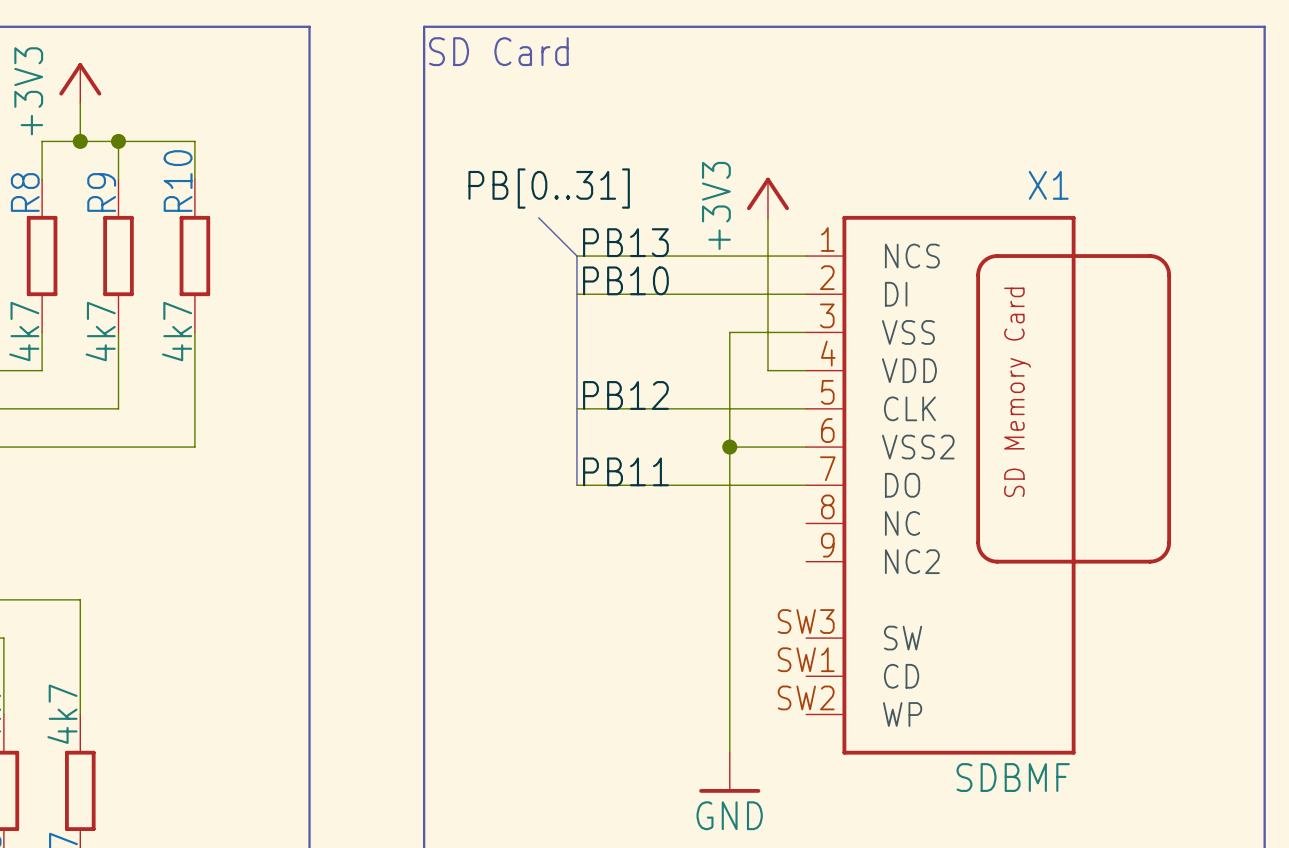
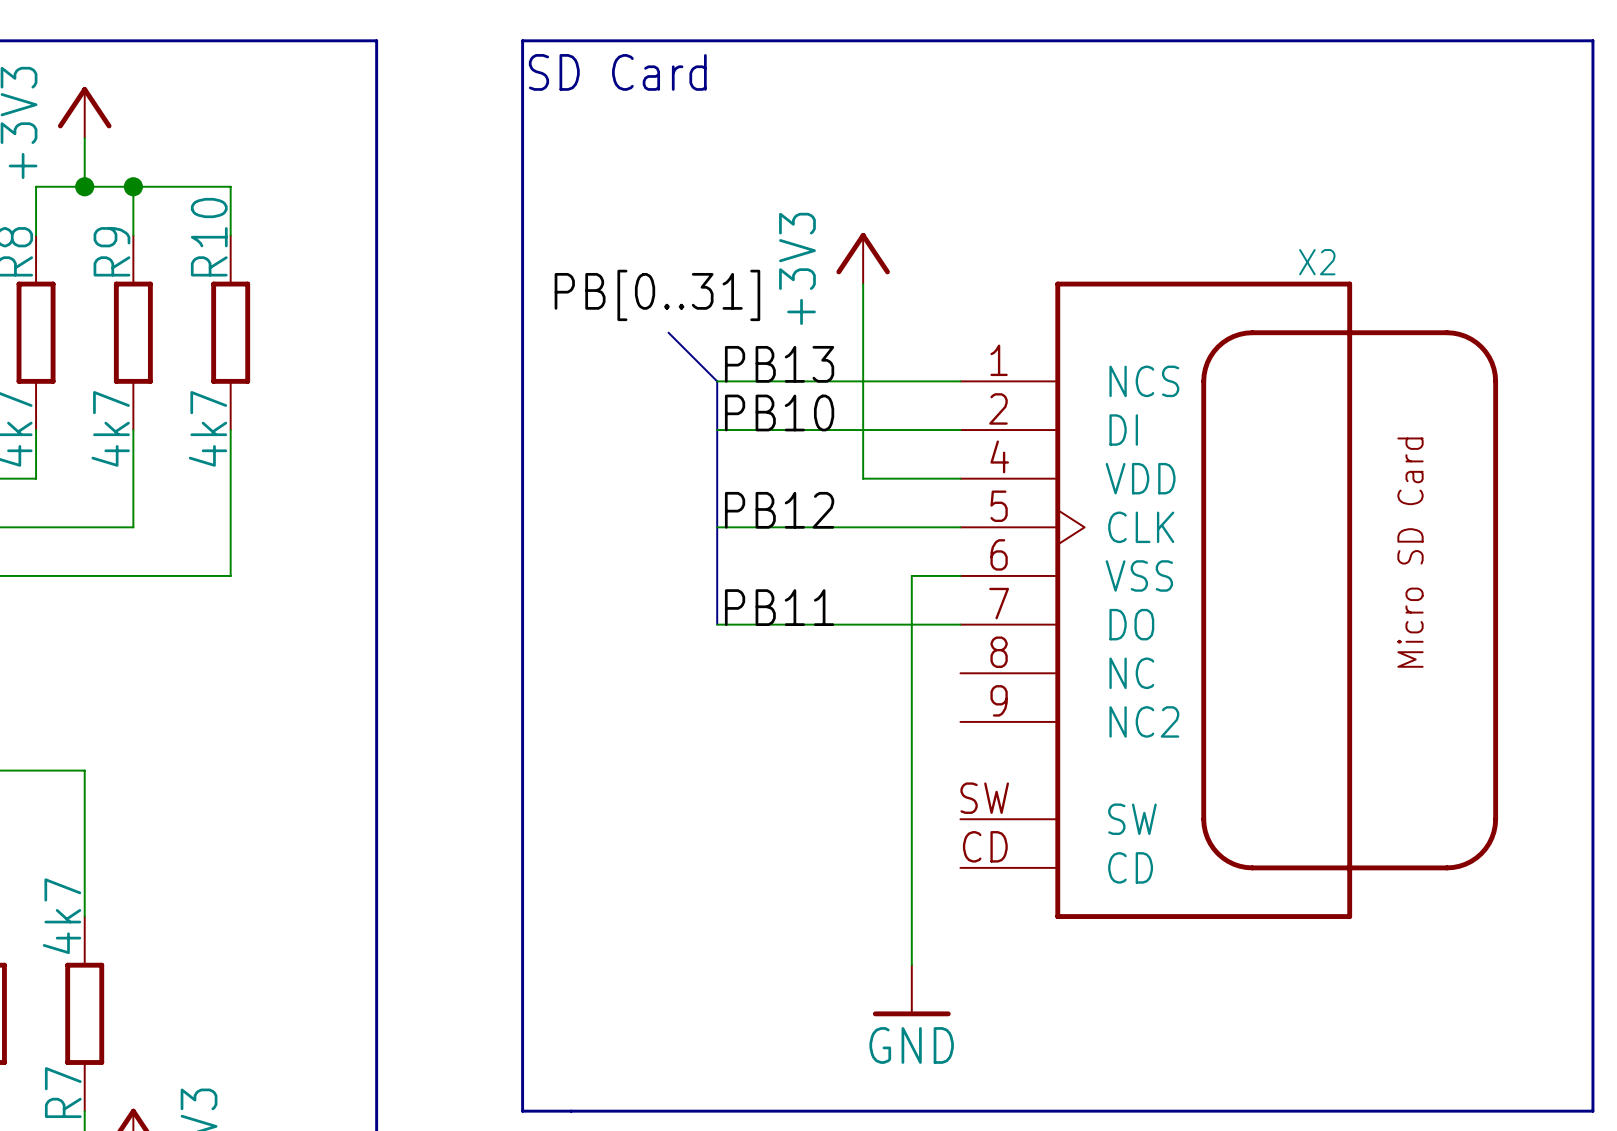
label position: PB[0..31] (549, 188) -> PB[0..31] (657, 295)
power symbol position: +3V3 (767, 197) -> +3V3 (863, 258)
bus: (538, 217) (576, 256) (576, 294) -> (668, 332) (717, 381)
wire: none -> (863, 284) (863, 478) (960, 478)
wire: (767, 217) (767, 370) (806, 370) -> none
label: PB13 (625, 242) -> none
wire: (576, 256) (806, 256) -> none
label: PB10 (625, 280) -> PB13 (779, 364)
label: none -> PB10 (779, 412)
wire: (729, 332) (729, 447) -> (911, 430) (717, 430)
junction: (729, 447) -> none
X2: none -> (1229, 600)
X1: SDBMF (988, 485) -> none

